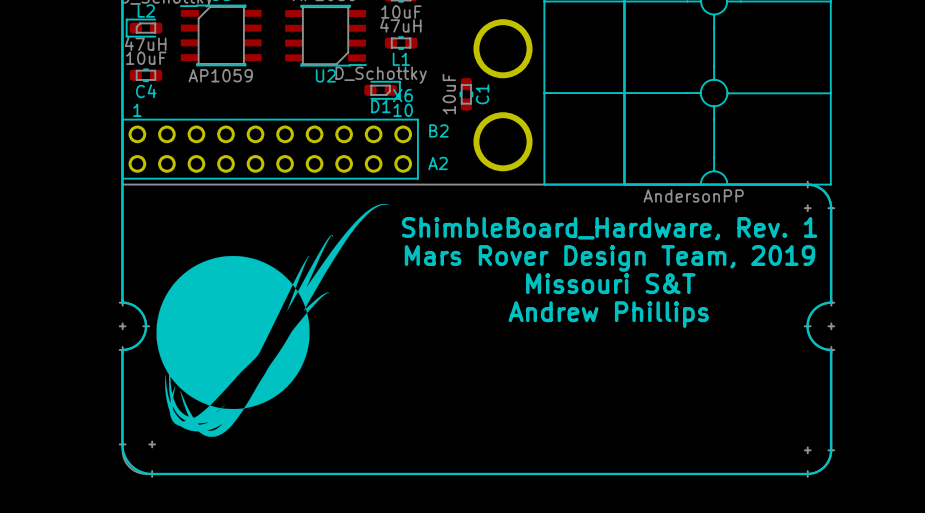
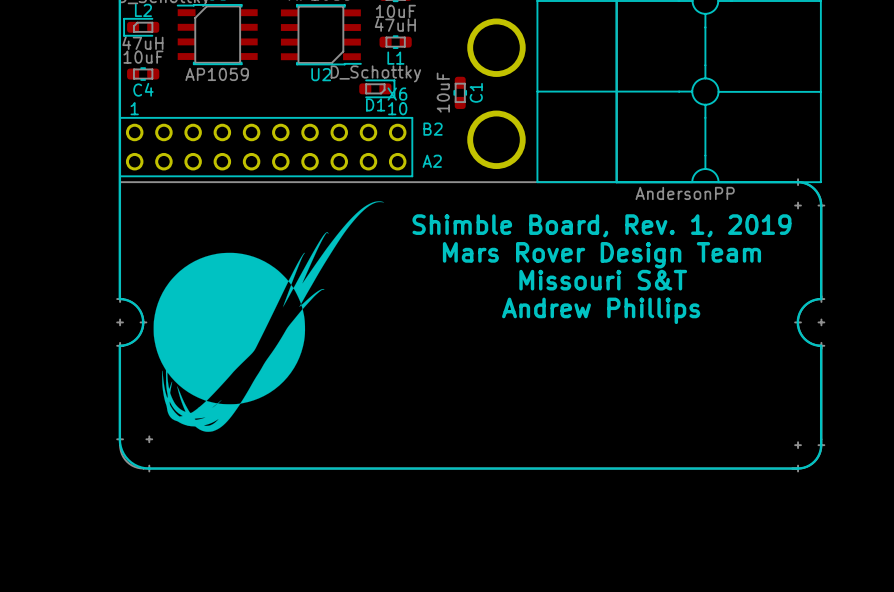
text: ShimbleBoard_Hardware, Rev. 1 (609, 228) -> Shimble Board, Rev. 1, 2019 (601, 225)
text: Mars Rover Design Team, 2019 (610, 258) -> Mars Rover Design Team (601, 255)

